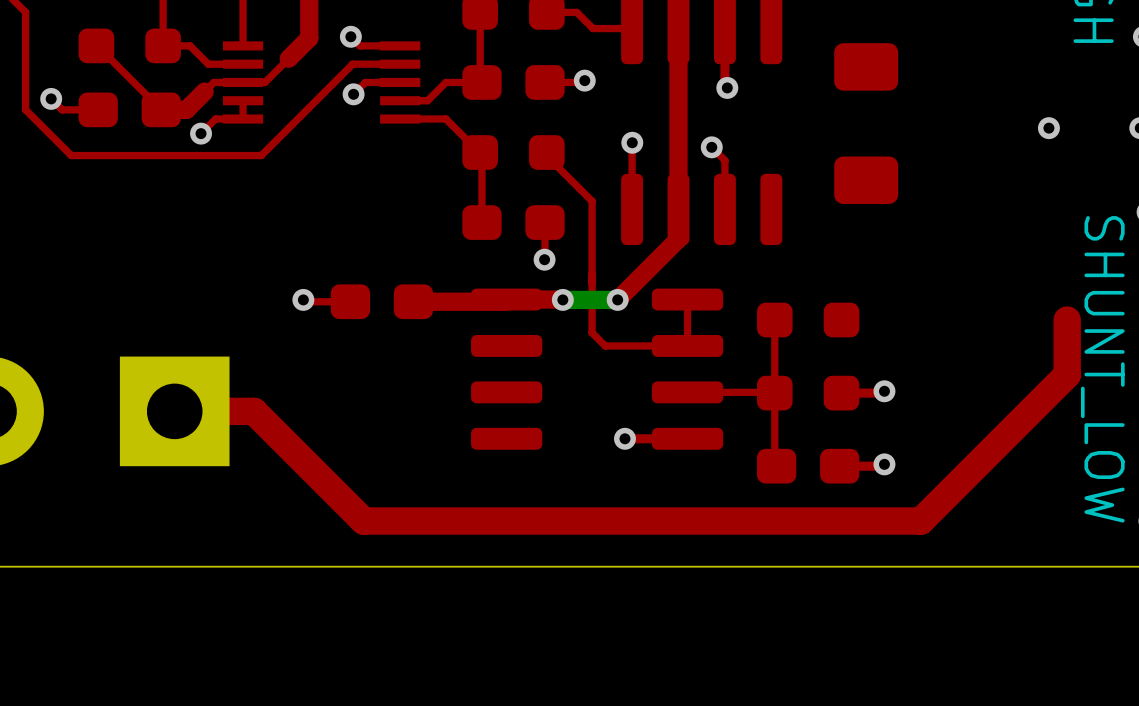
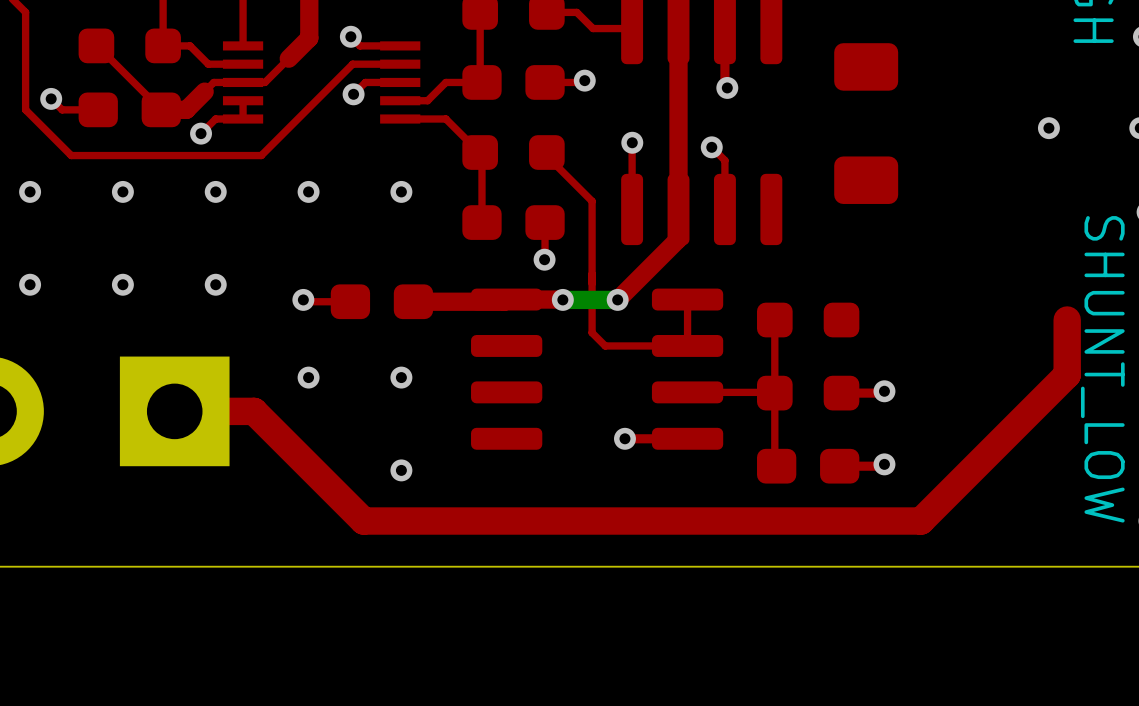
via: none -> (30, 191)
via: none -> (122, 191)
via: none -> (215, 191)
via: none -> (308, 191)
via: none -> (401, 191)
via: none -> (30, 284)
via: none -> (122, 284)
via: none -> (215, 284)
via: none -> (308, 377)
via: none -> (401, 377)
via: none -> (401, 470)

